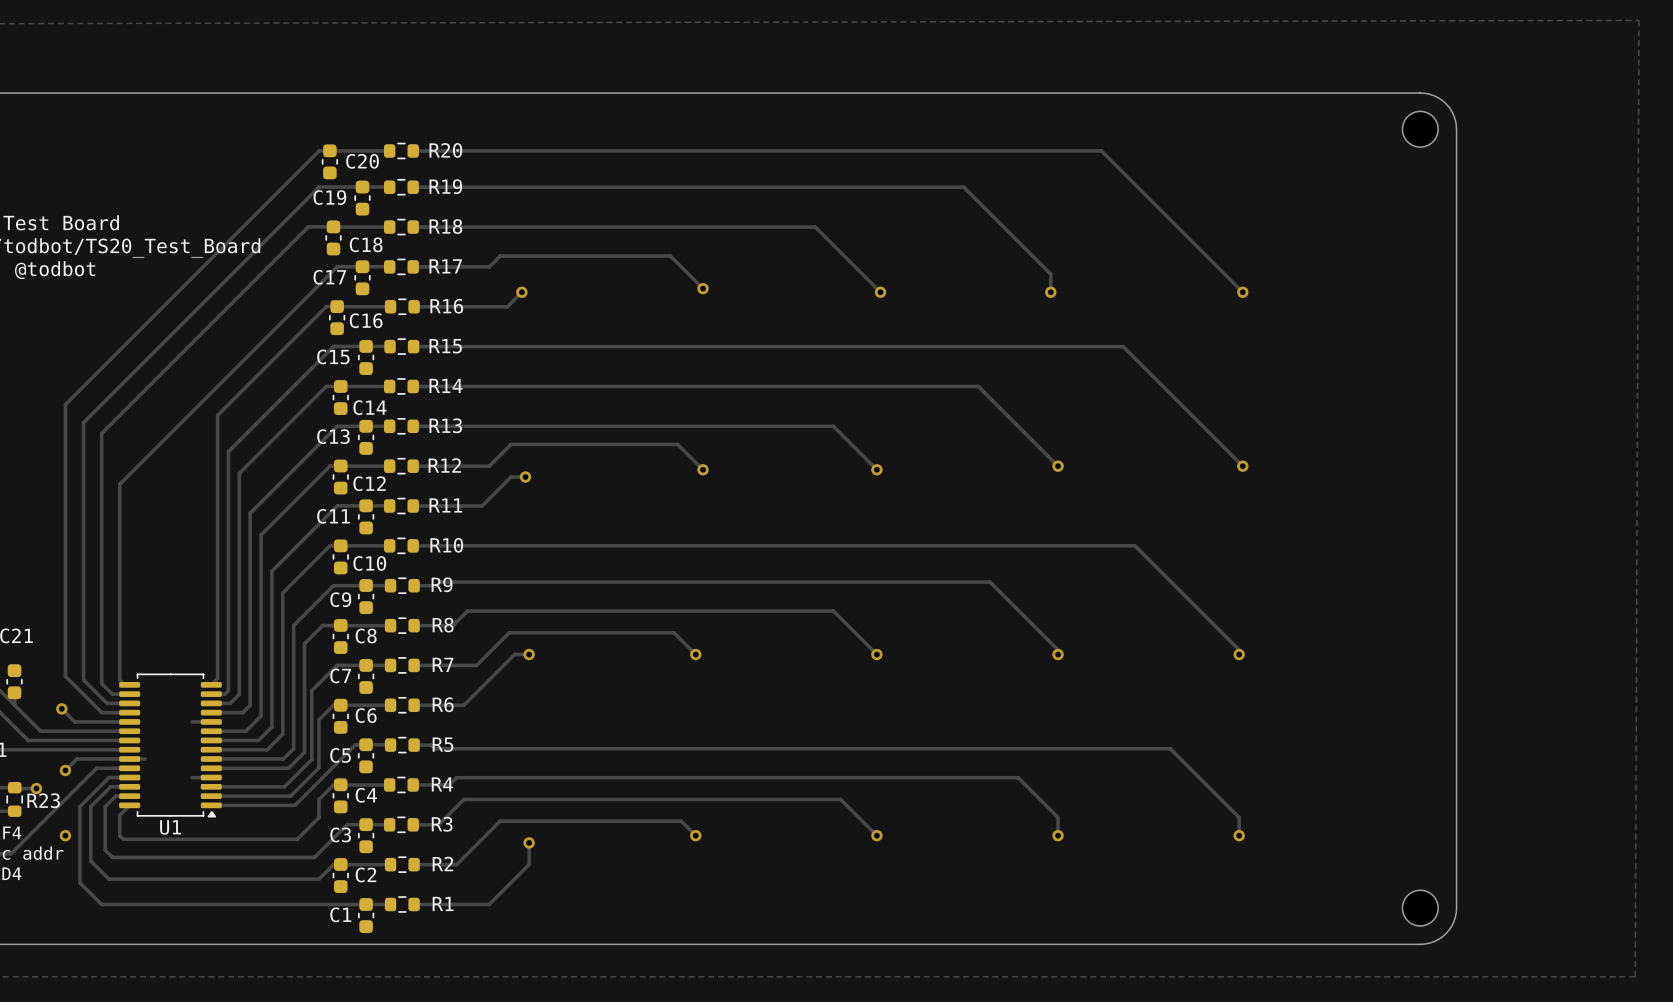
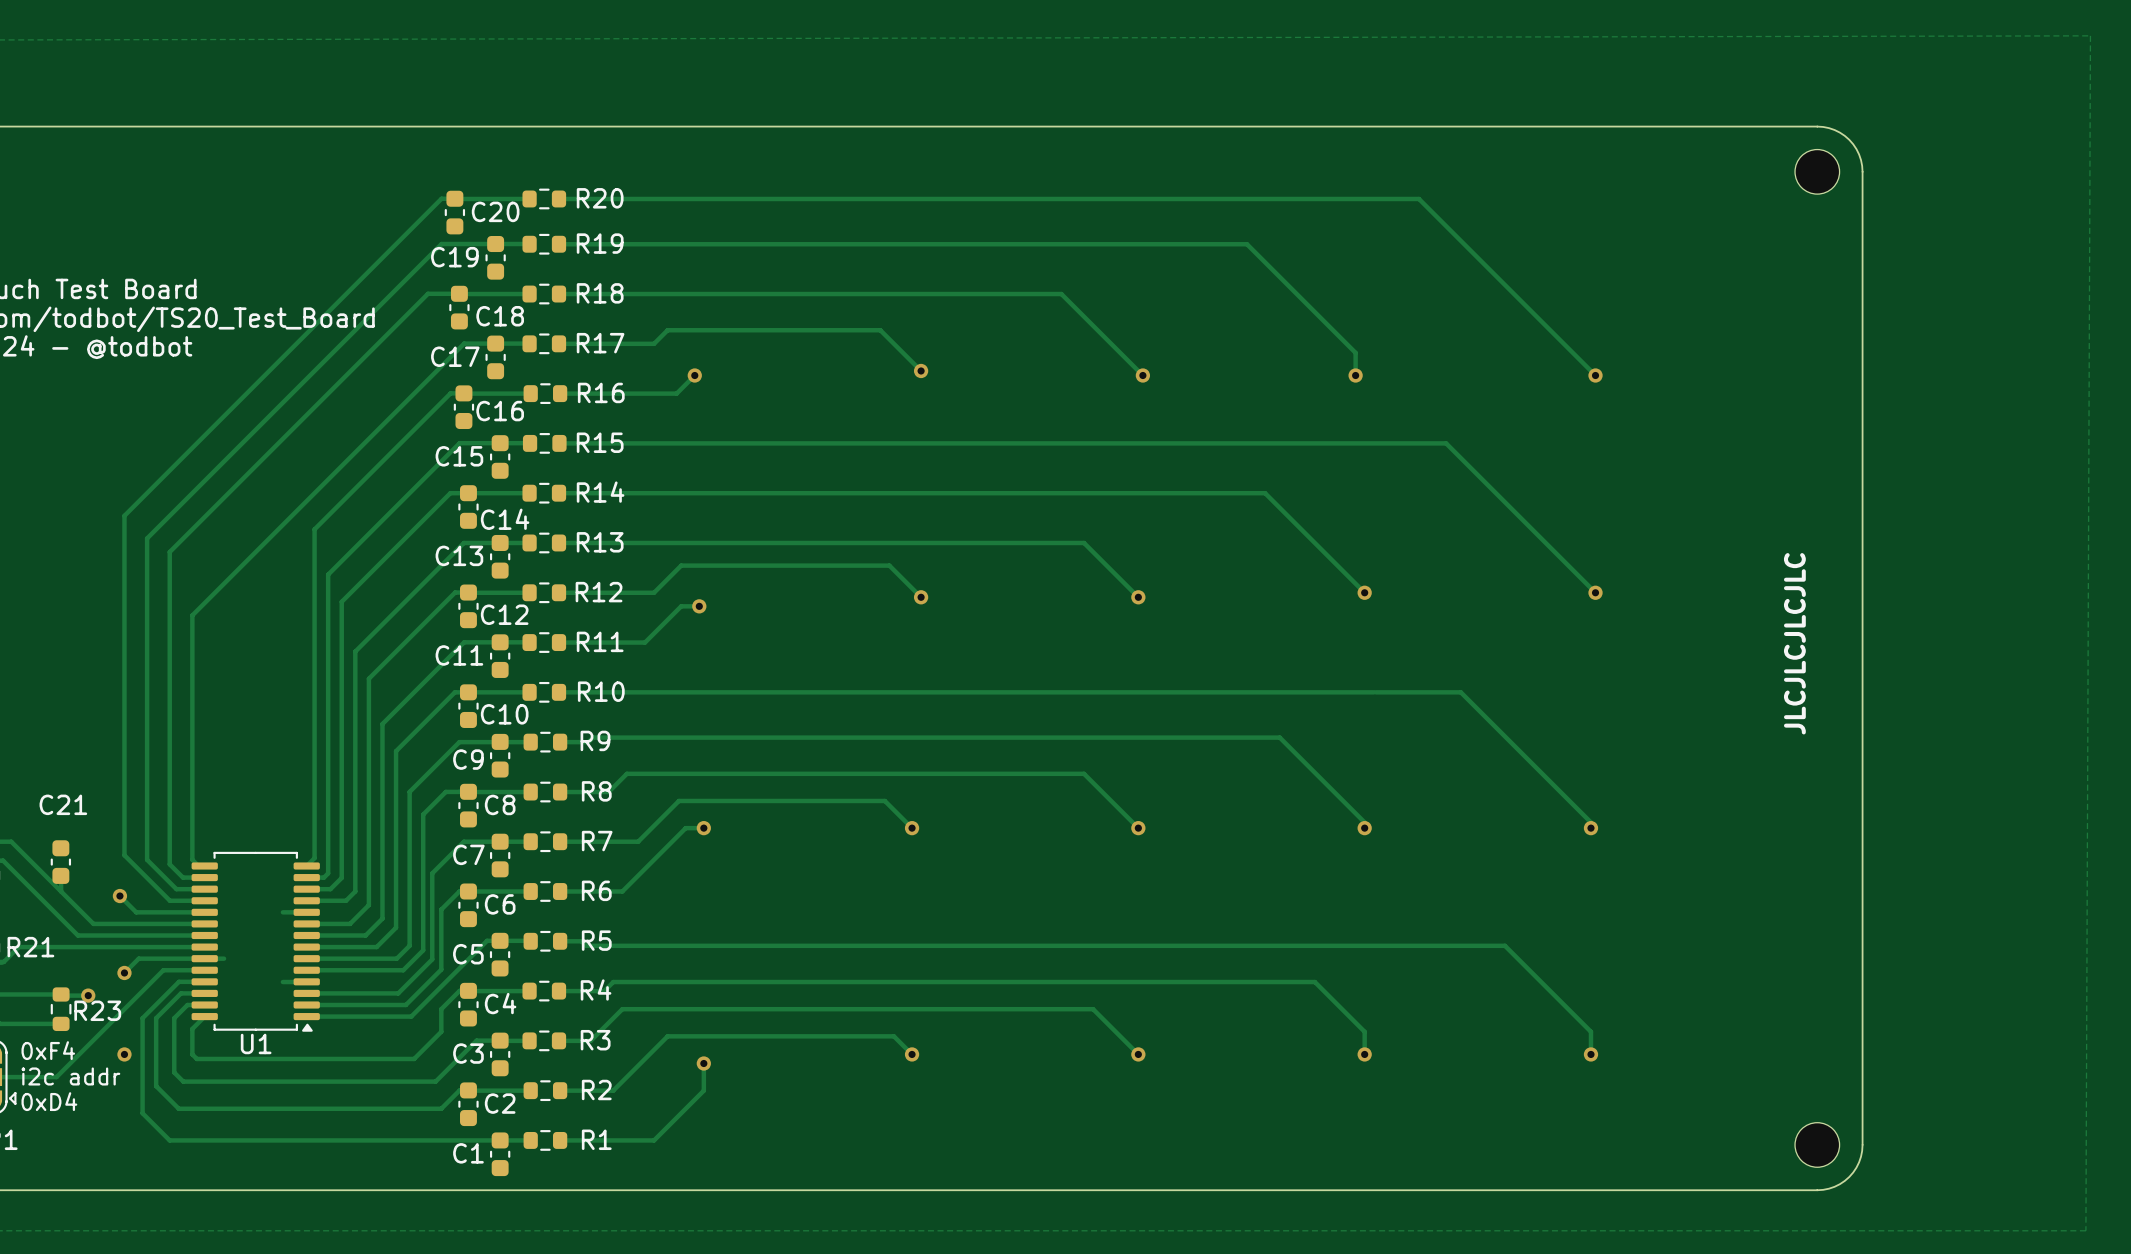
text: none -> JLCJLCJLCJLC (1794, 643)

